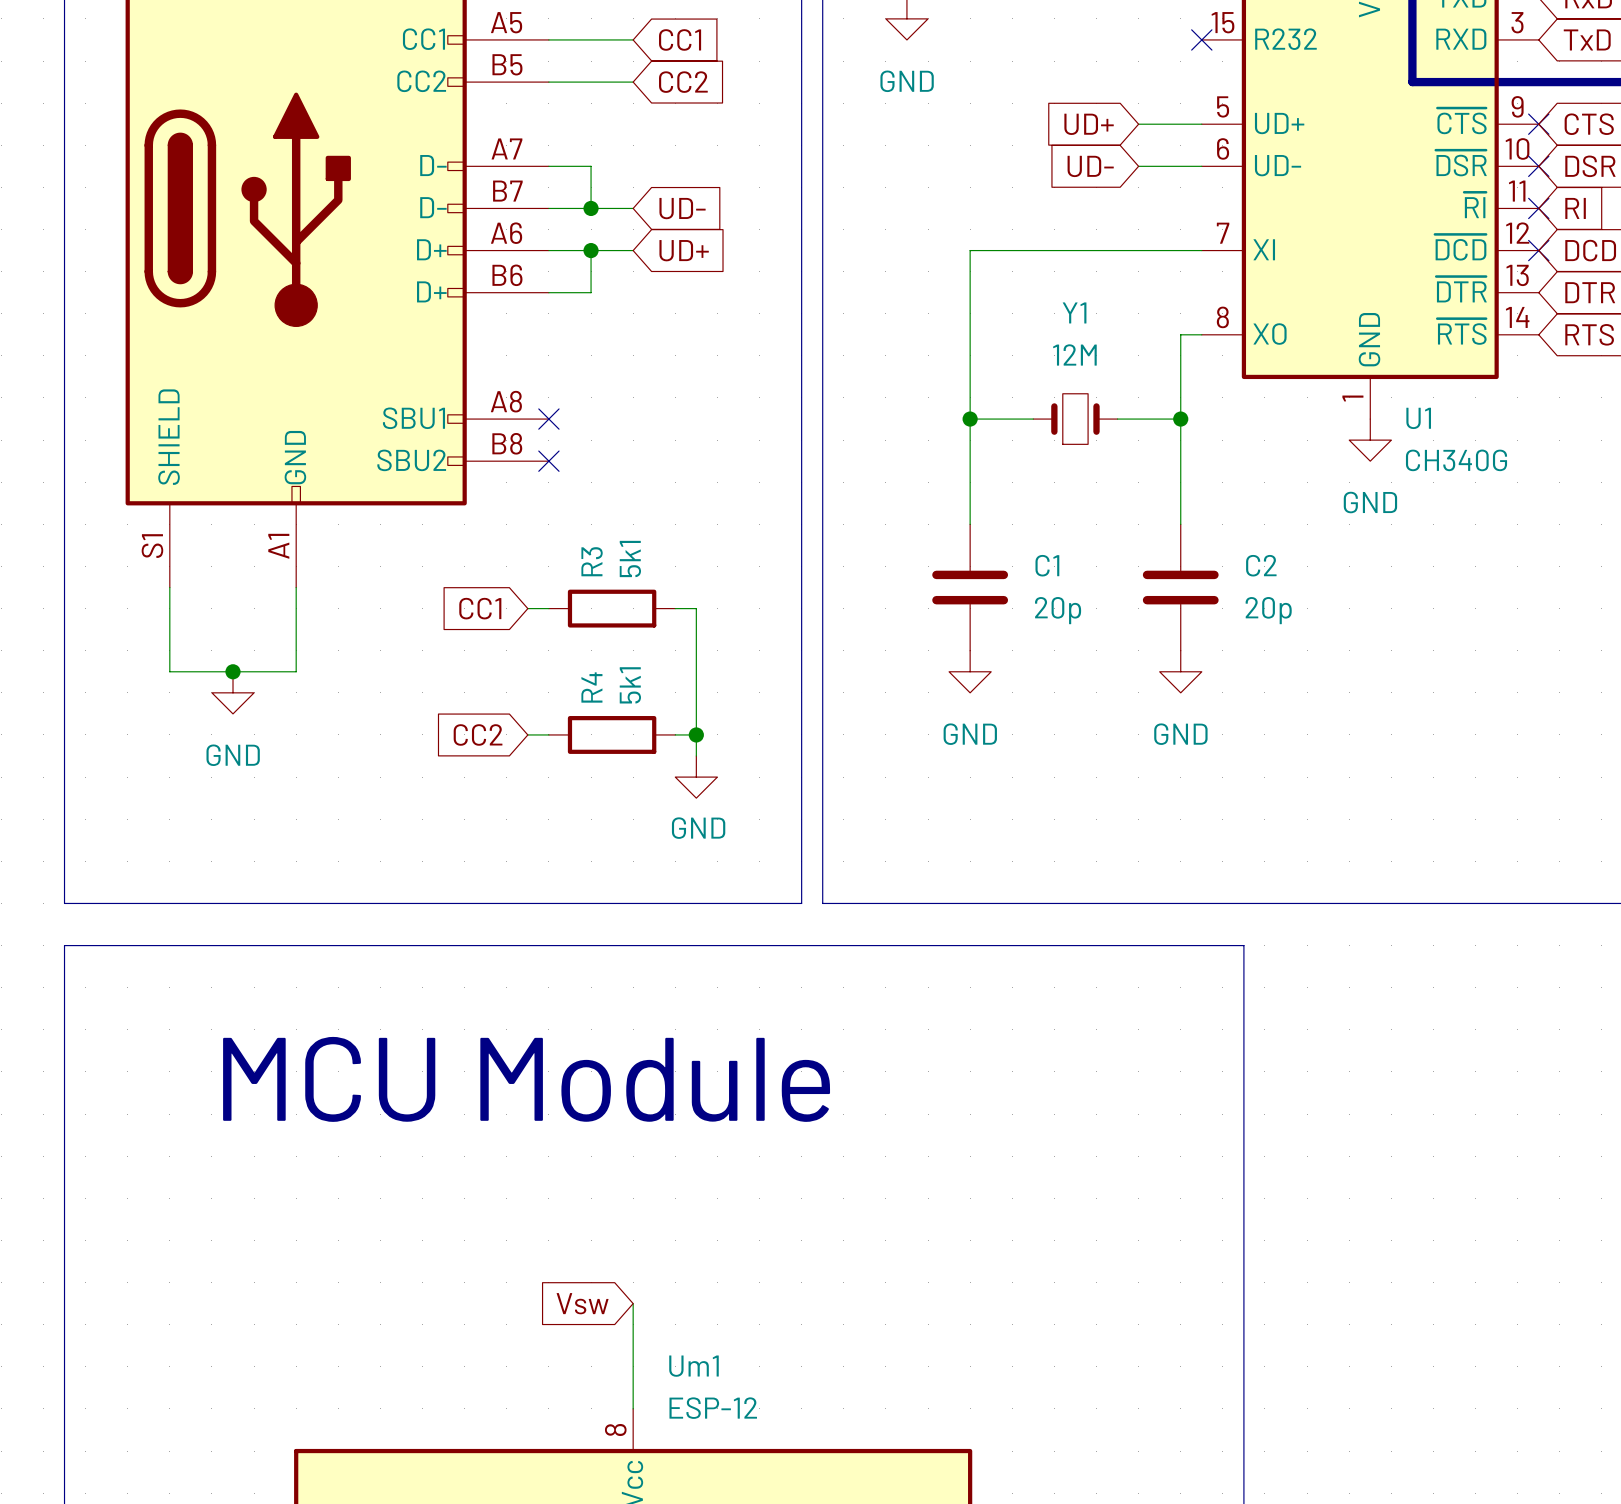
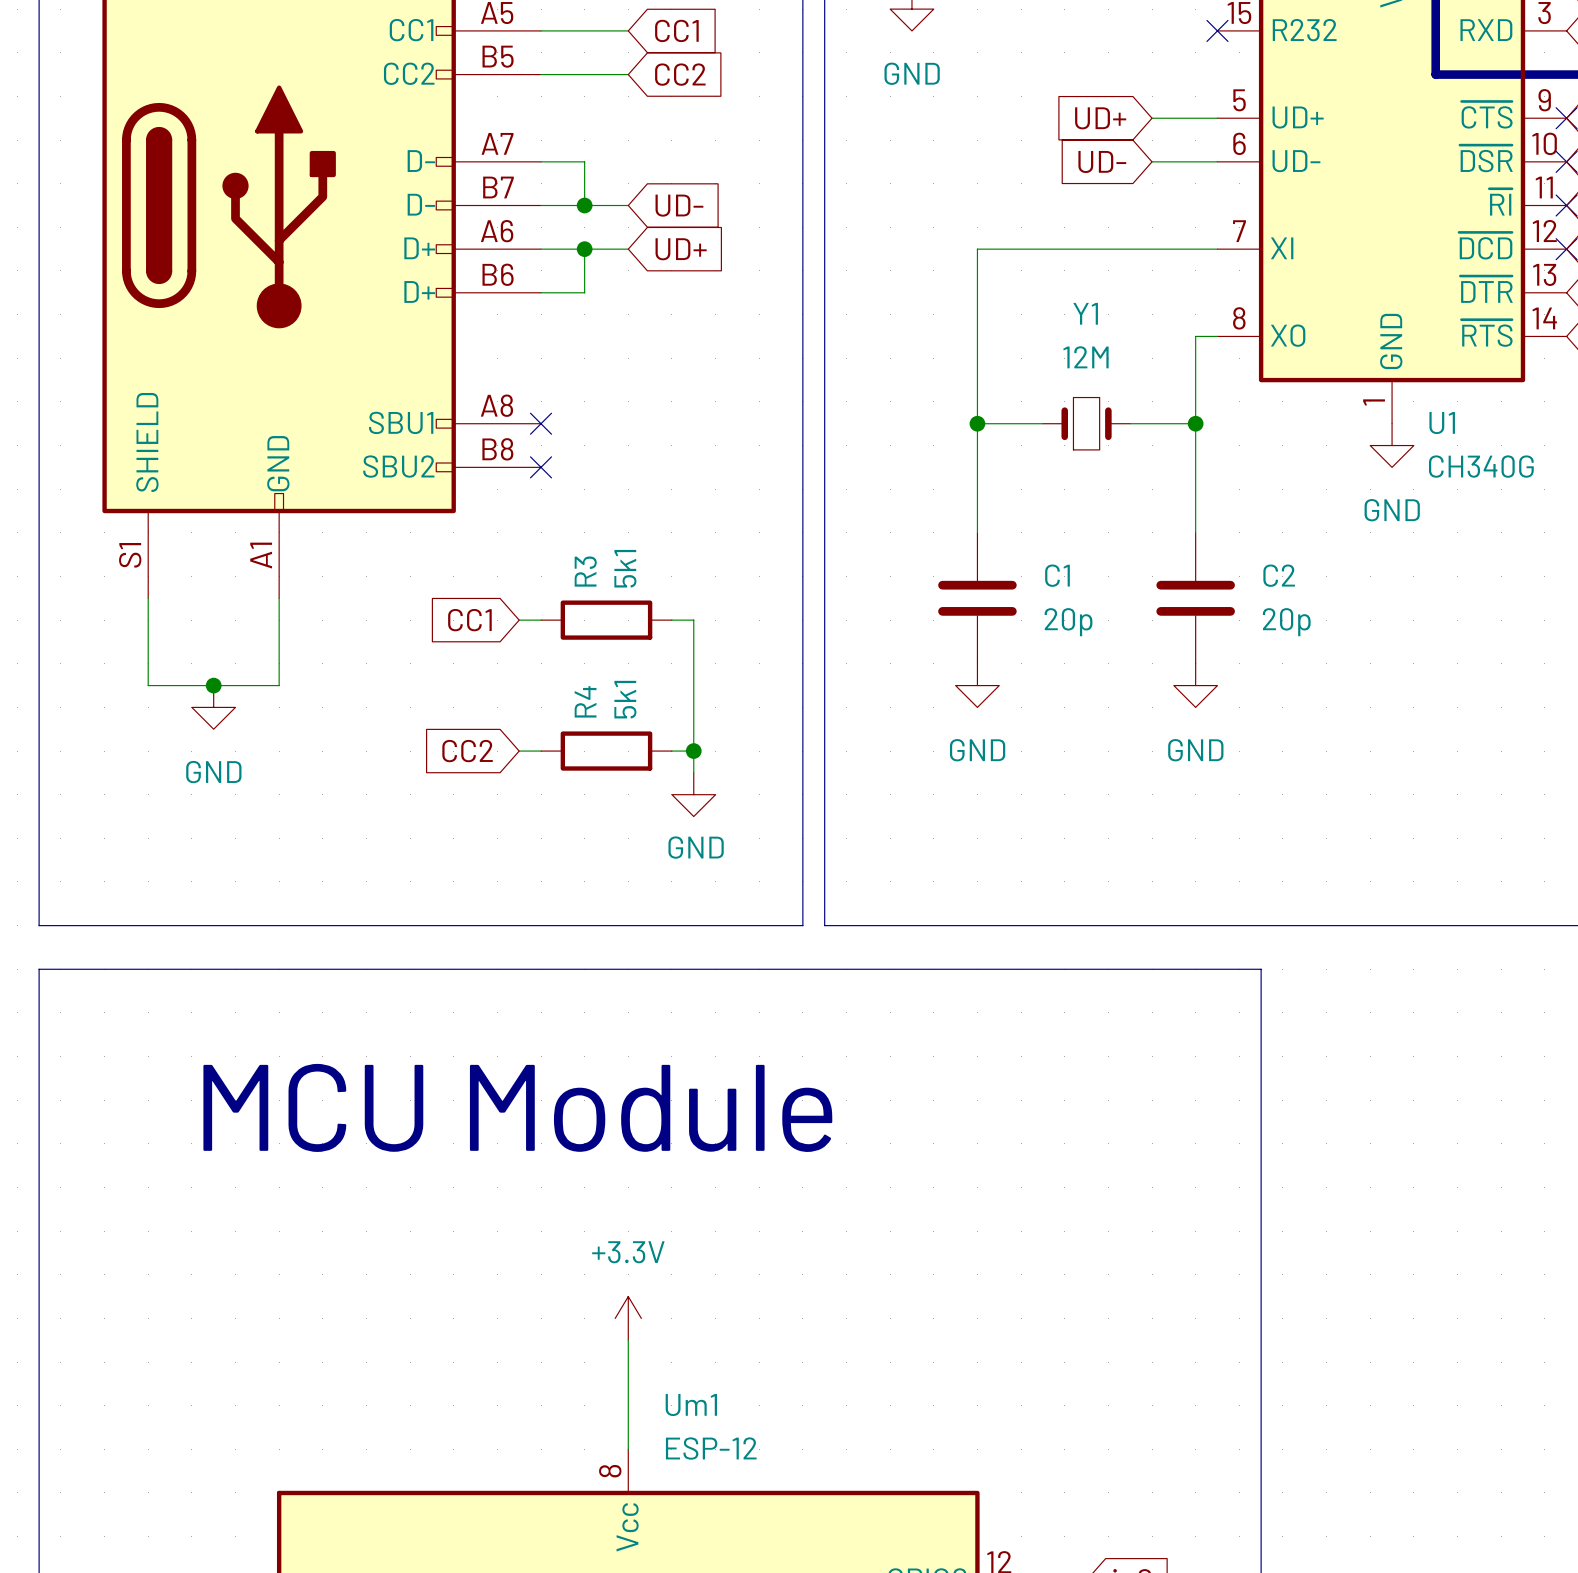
power symbol: none -> +3.3V (628, 1318)
global label: Vsw (582, 1303) -> none

